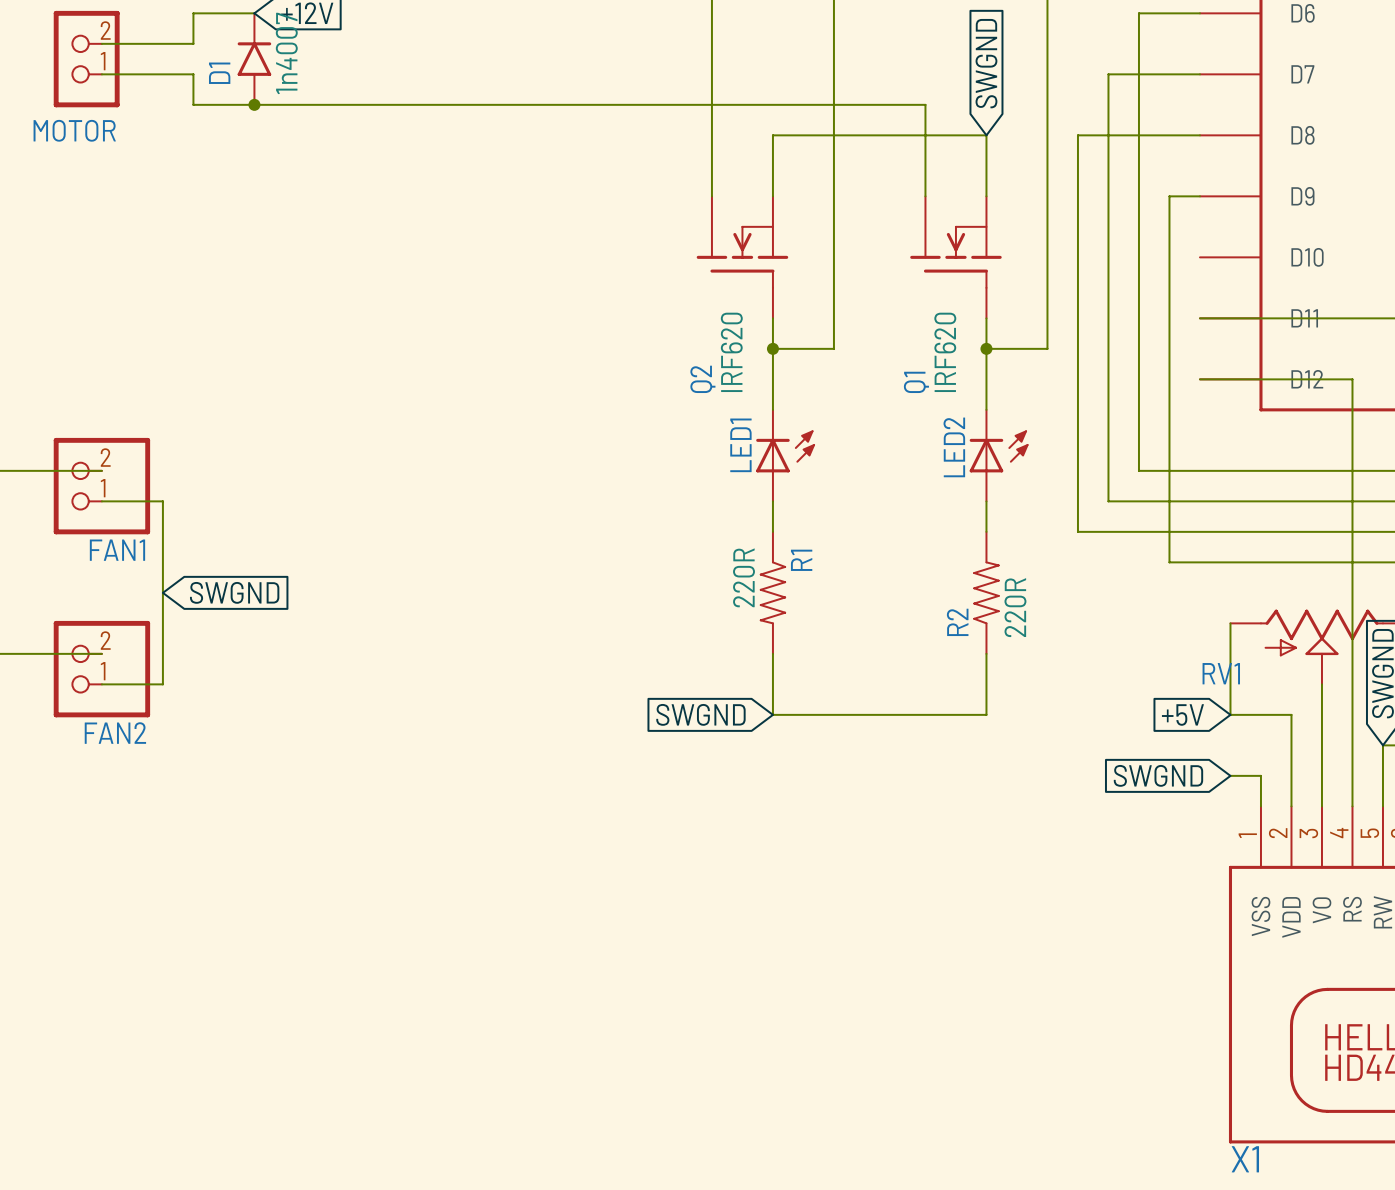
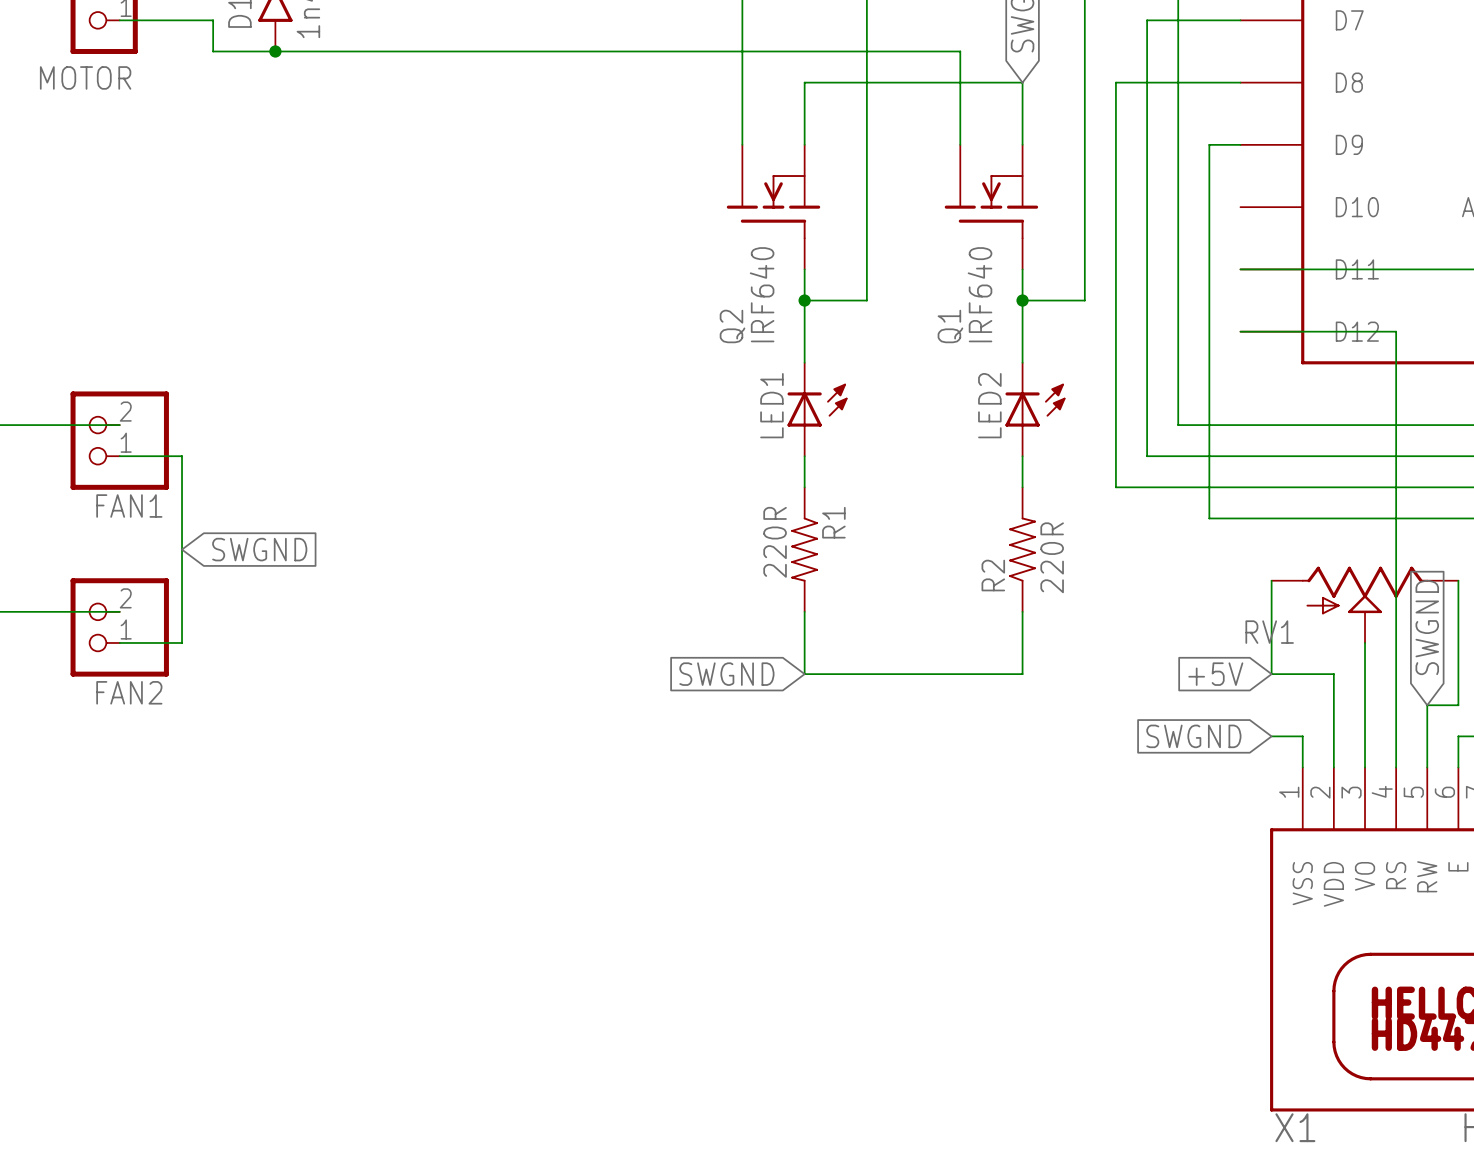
Q2 value: IRF620 (731, 352) -> IRF640 (762, 294)
Q1 value: IRF620 (945, 352) -> IRF640 (980, 294)

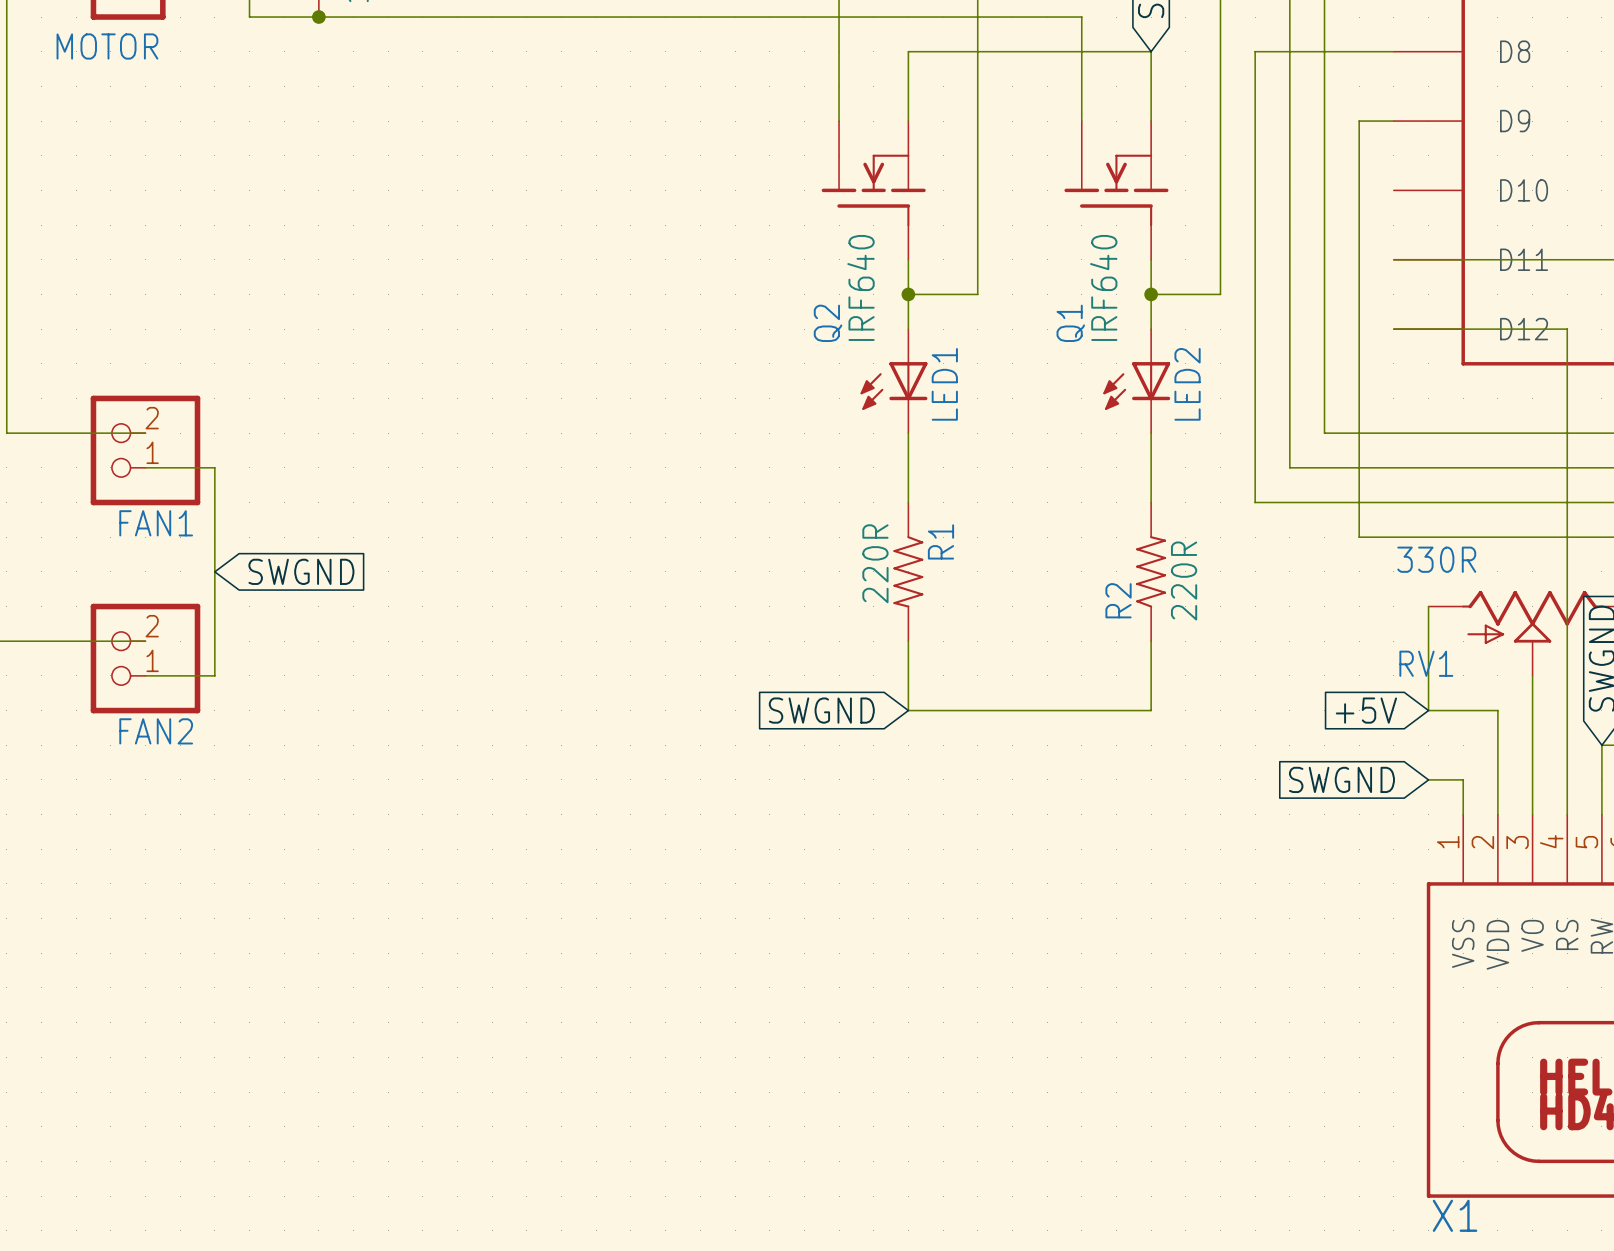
LED1 rotation: 0° (817, 405) -> 180° (893, 385)
LED2 rotation: 0° (1035, 405) -> 180° (1136, 385)
RV1 value: none -> 330R (1436, 559)

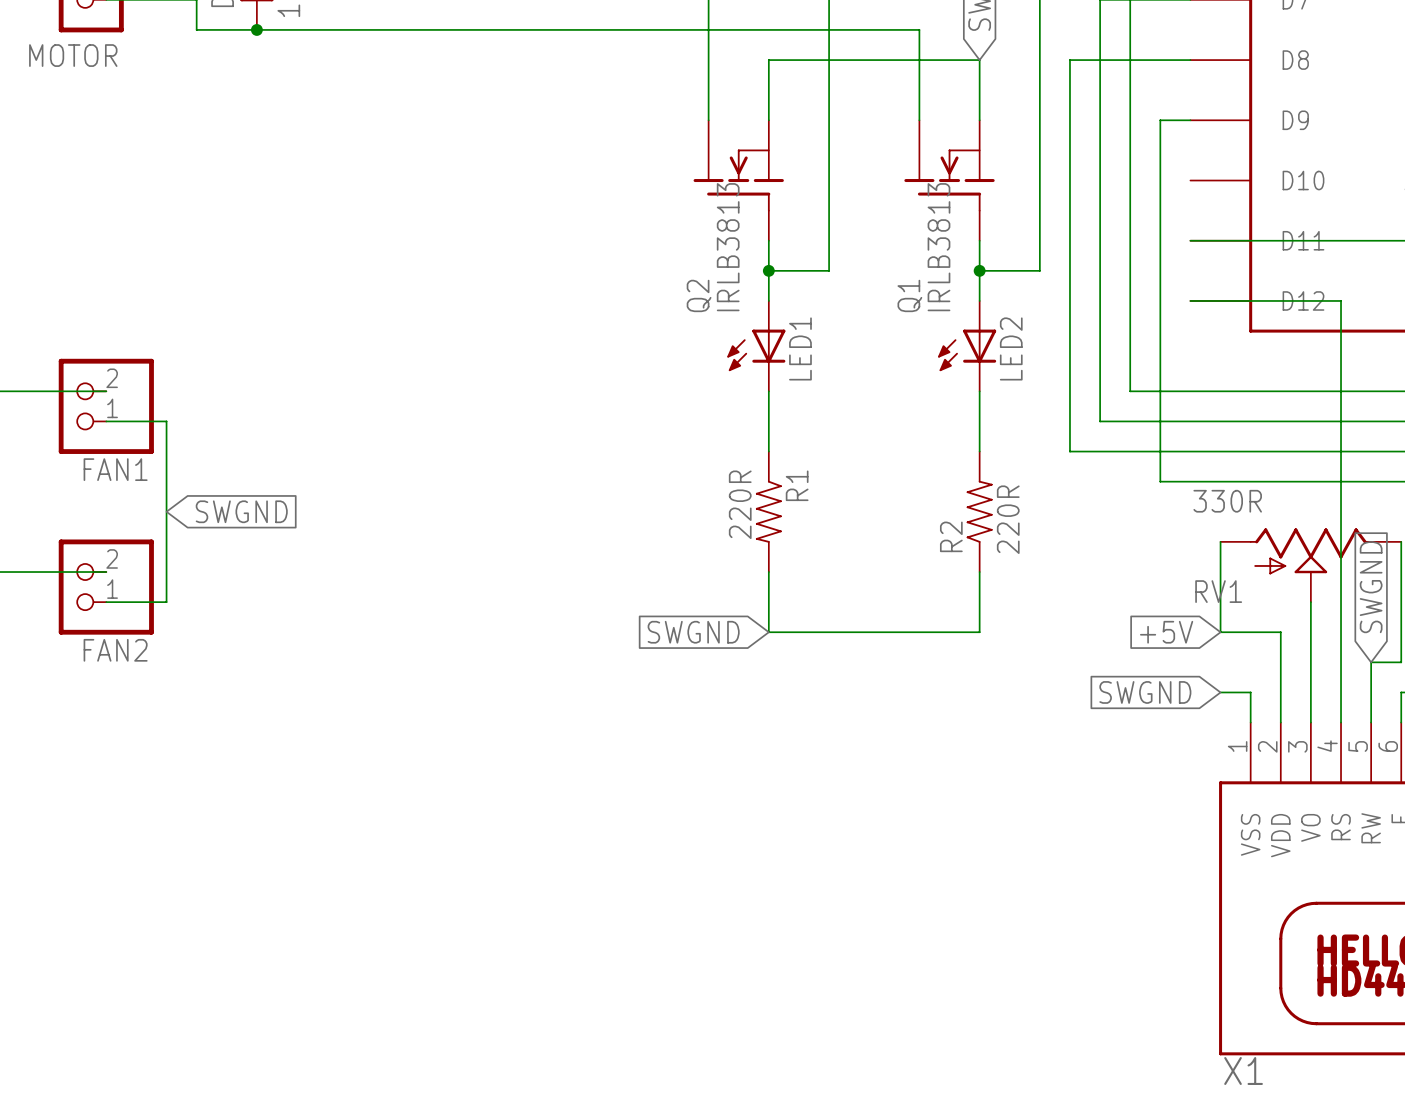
Q2 value: IRF640 (860, 287) -> IRLB3813 (728, 247)
Q1 value: IRF640 (1103, 287) -> IRLB3813 (938, 247)

